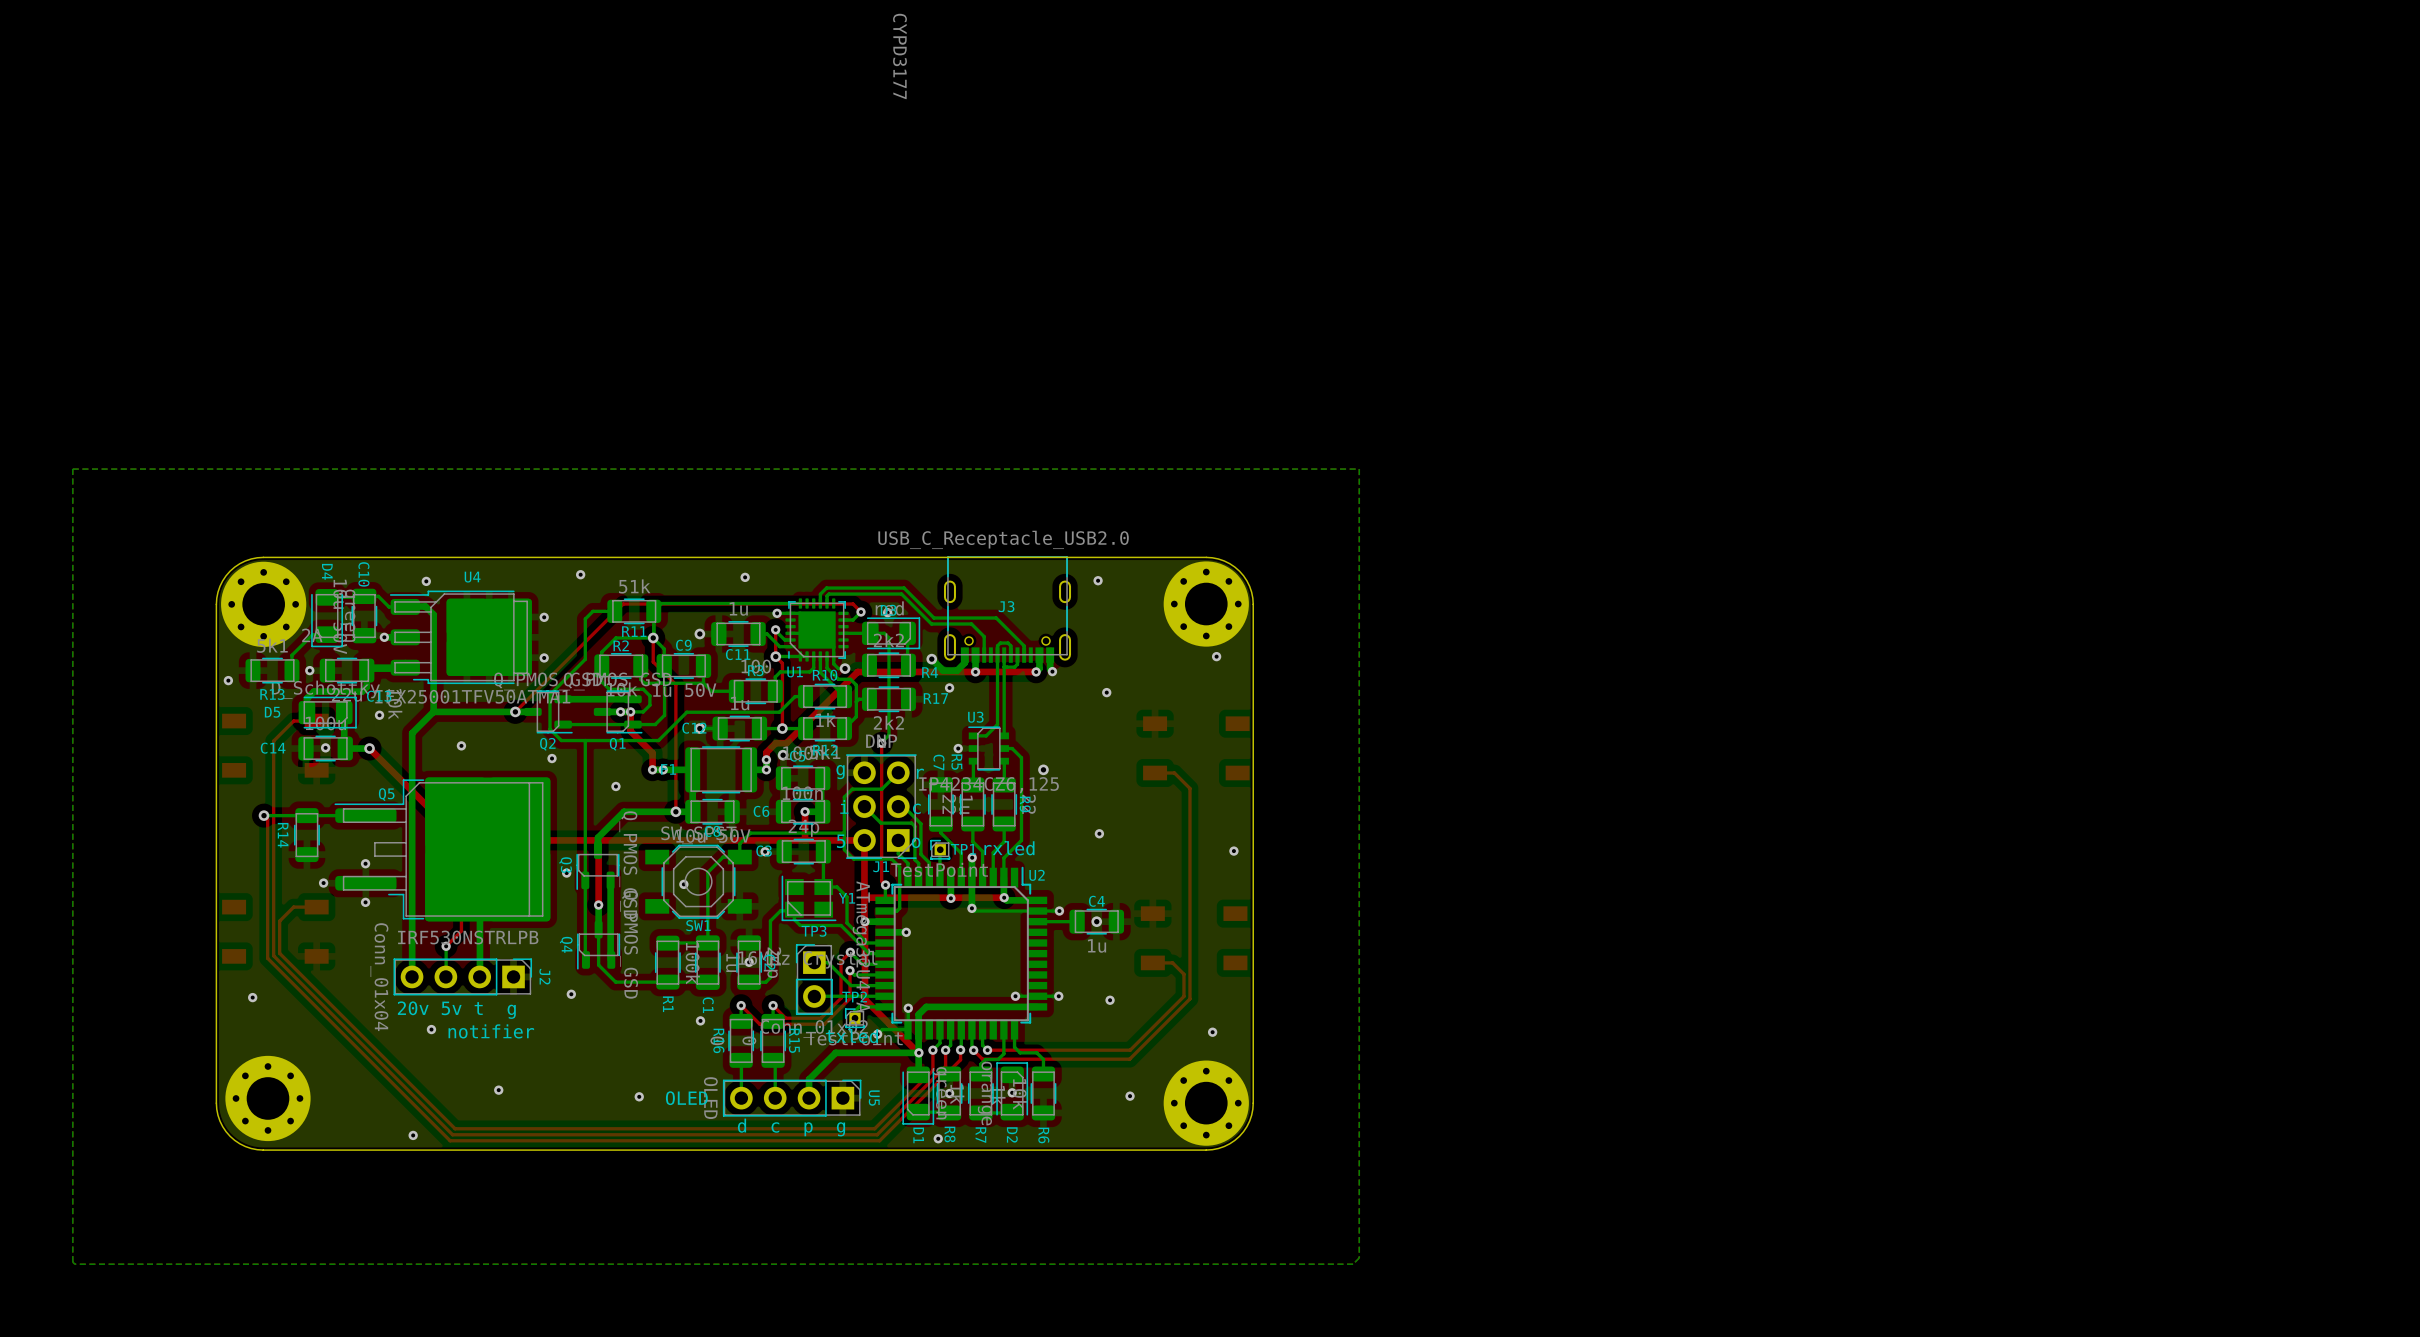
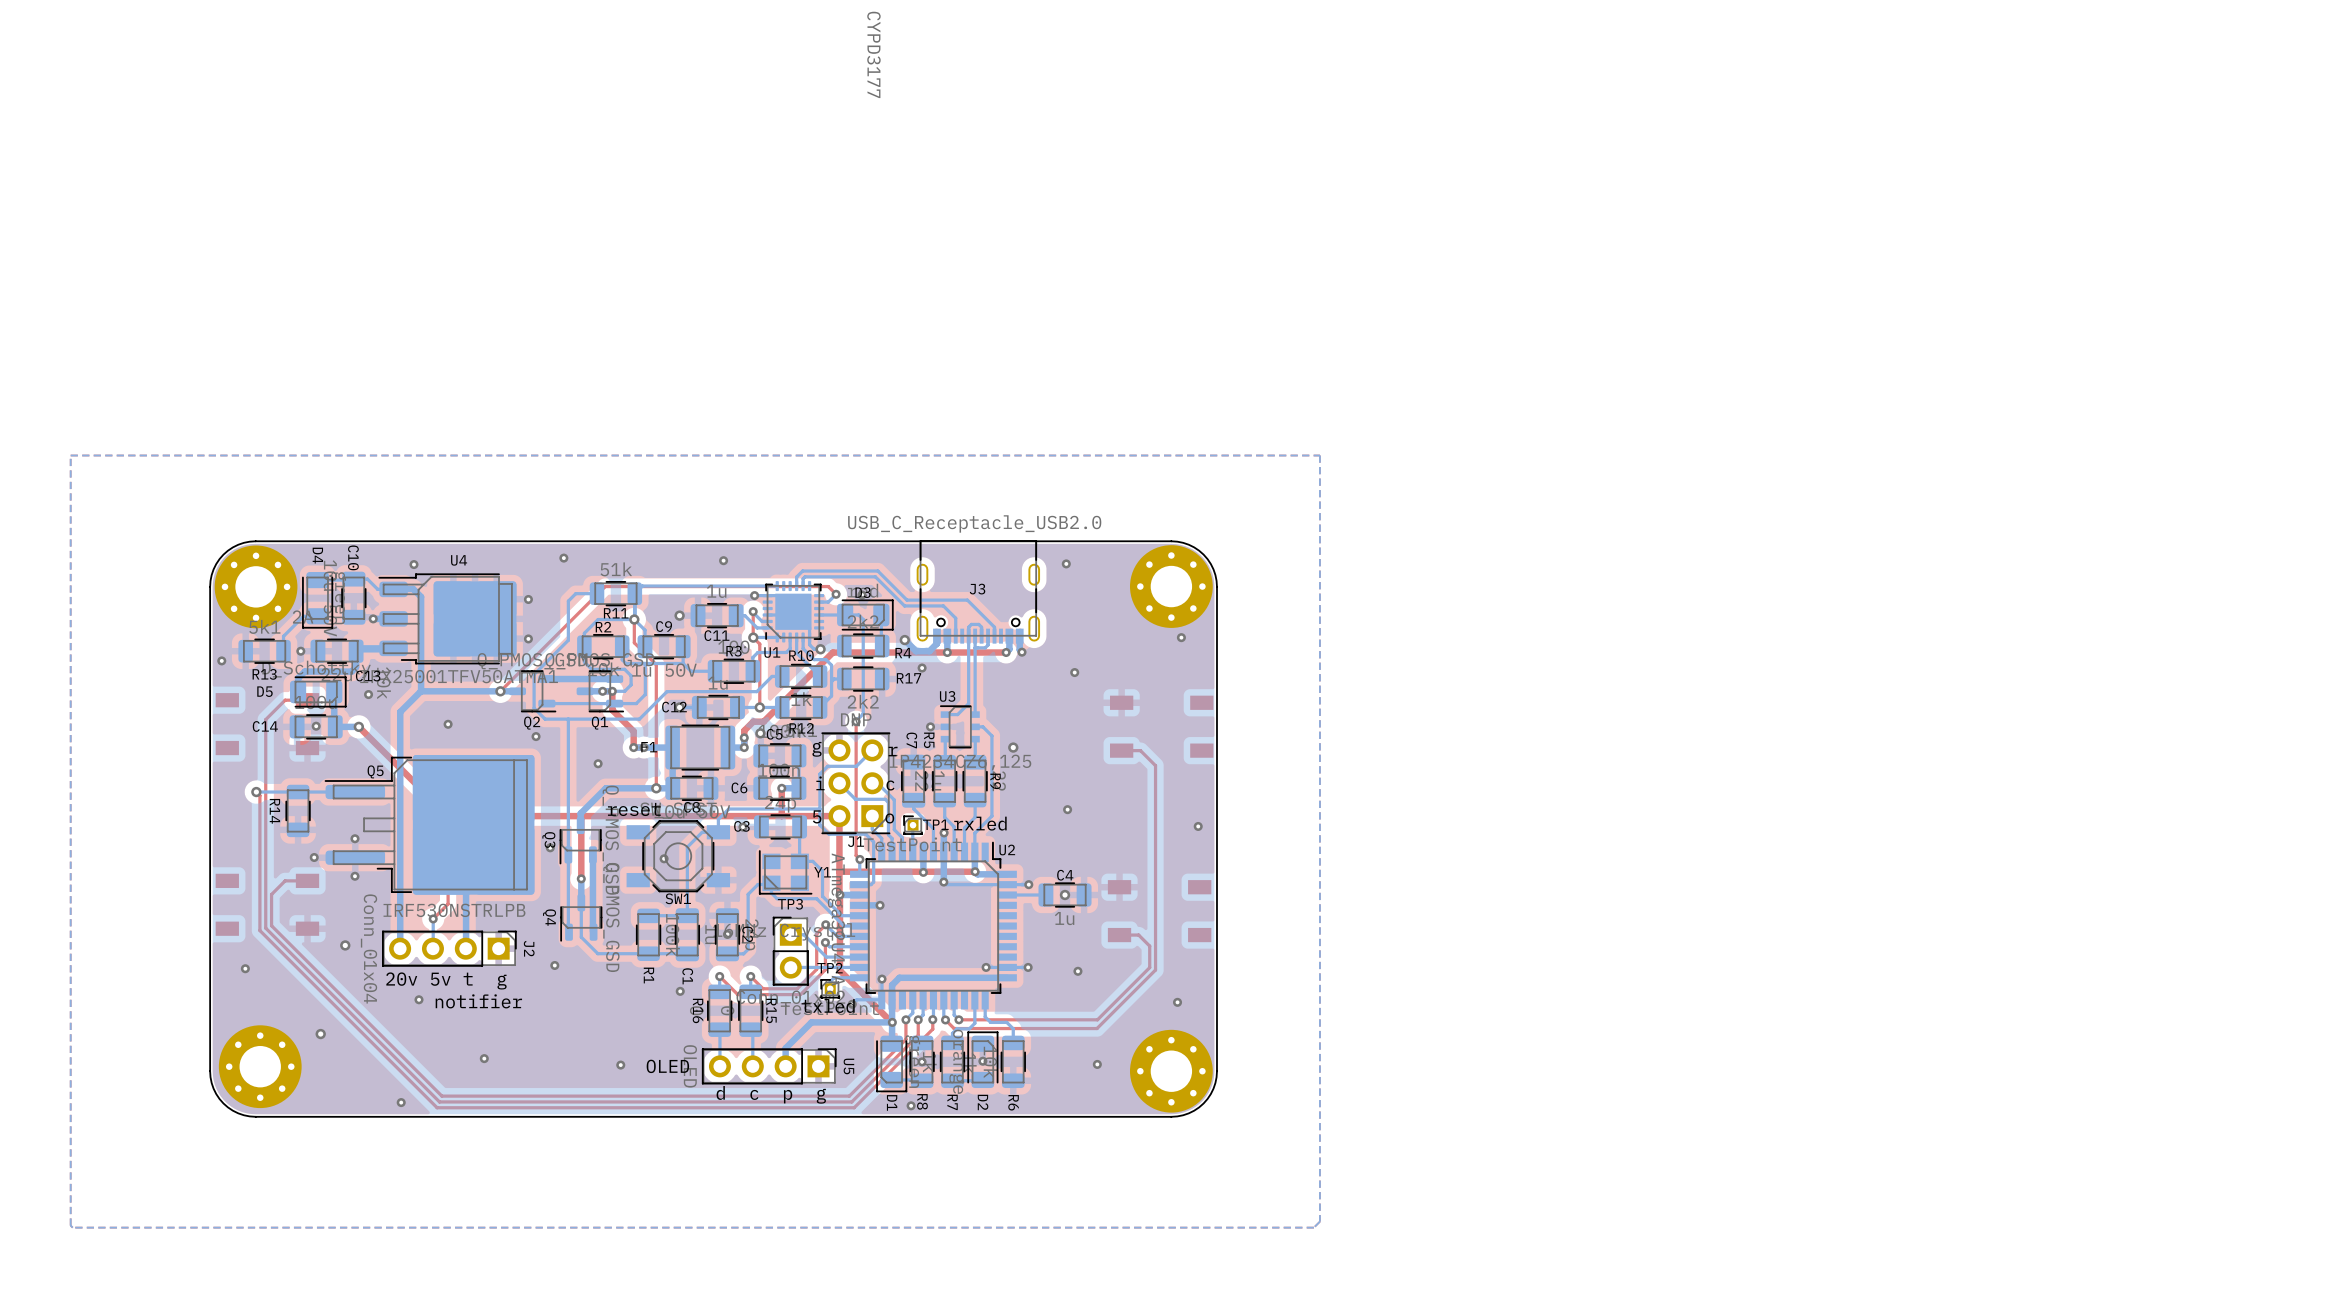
text: none -> reset (634, 809)
via: none -> (345, 945)
via: none -> (320, 1034)

